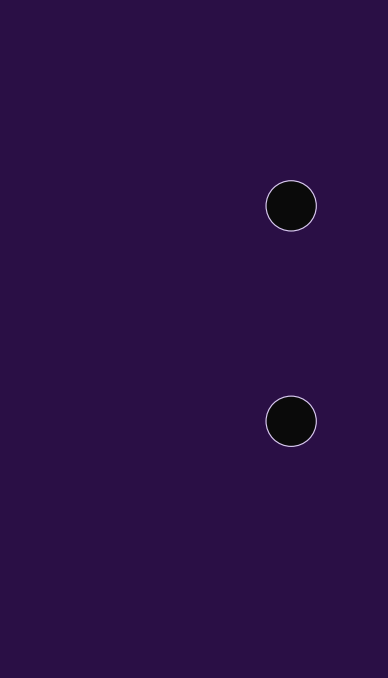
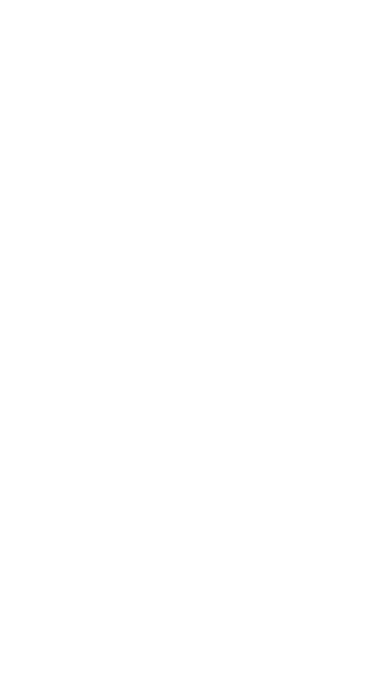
part: (291, 313) -> none

